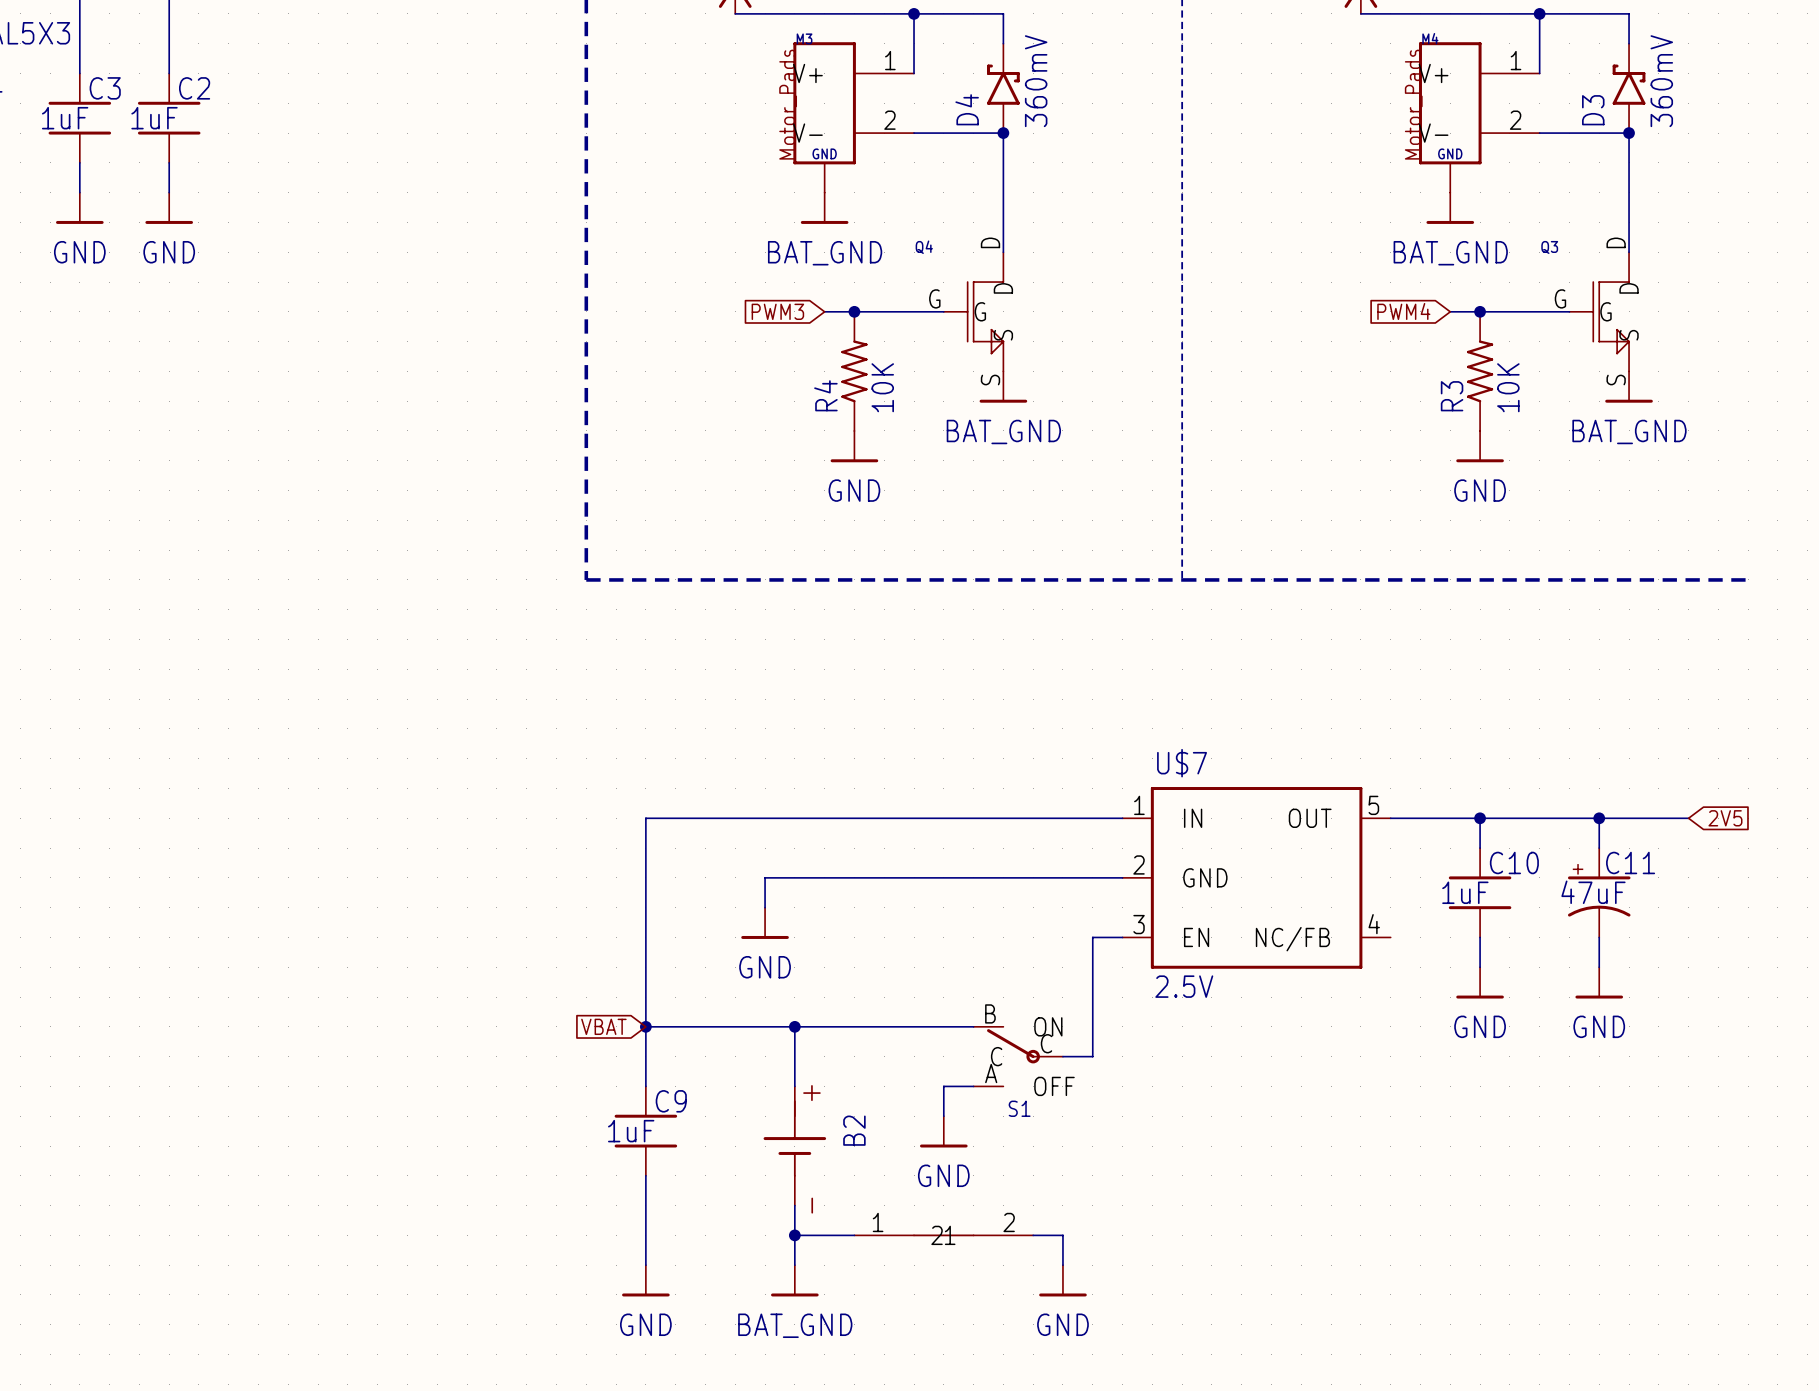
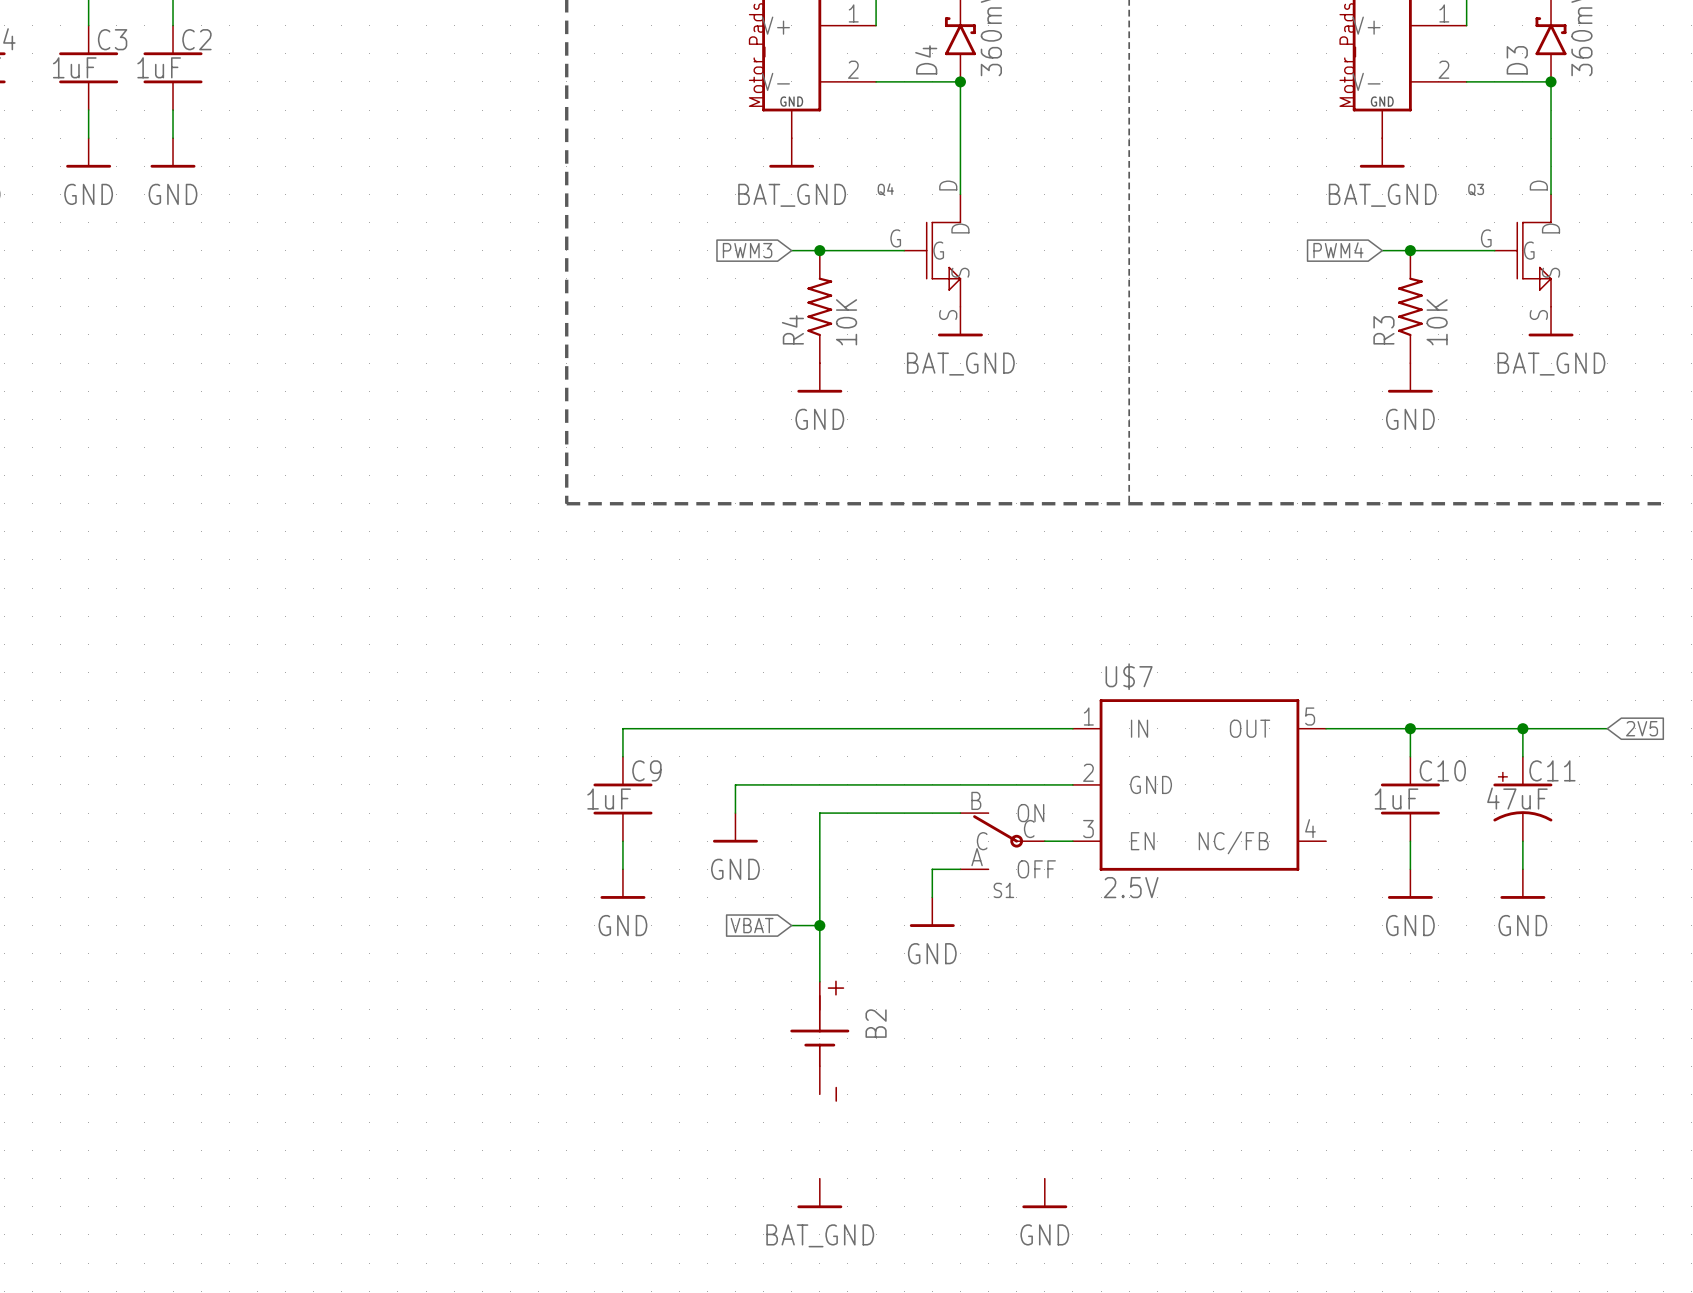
wire: none -> (960, 813) (819, 813) (819, 981)
wire: (1092, 937) (1092, 1056) (1062, 1056) -> none
wire: (645, 967) (645, 1086) -> none
power symbol: none -> GND (622, 884)
power symbol: none -> GND (932, 912)
global label position: VBAT (603, 1026) -> VBAT (752, 925)
wire: (645, 1026) (824, 1026) -> none
junction: (645, 1026) -> none
wire: (794, 1026) (794, 1086) -> none
junction position: (794, 1026) -> (819, 925)
wire: (854, 1026) (973, 1026) -> none
S1 position: (1018, 1056) -> (1002, 841)
wire: (973, 1086) (943, 1086) (943, 1116) -> (960, 869) (932, 869) (932, 897)
C9 position: (645, 1131) -> (622, 799)
power symbol: GND (943, 1131) -> none
B2 position: (794, 1146) -> (819, 1038)
wire: (645, 1175) (645, 1265) -> none
wire: (794, 1205) (794, 1265) -> none
wire: (794, 1235) (854, 1235) -> none
junction: (794, 1235) -> none
part: (943, 1235) -> none
wire: (1033, 1235) (1062, 1235) (1062, 1265) -> none
power symbol: GND (645, 1280) -> none
power symbol position: BAT_GND (794, 1280) -> BAT_GND (819, 1193)
power symbol position: GND (1062, 1280) -> GND (1044, 1193)

